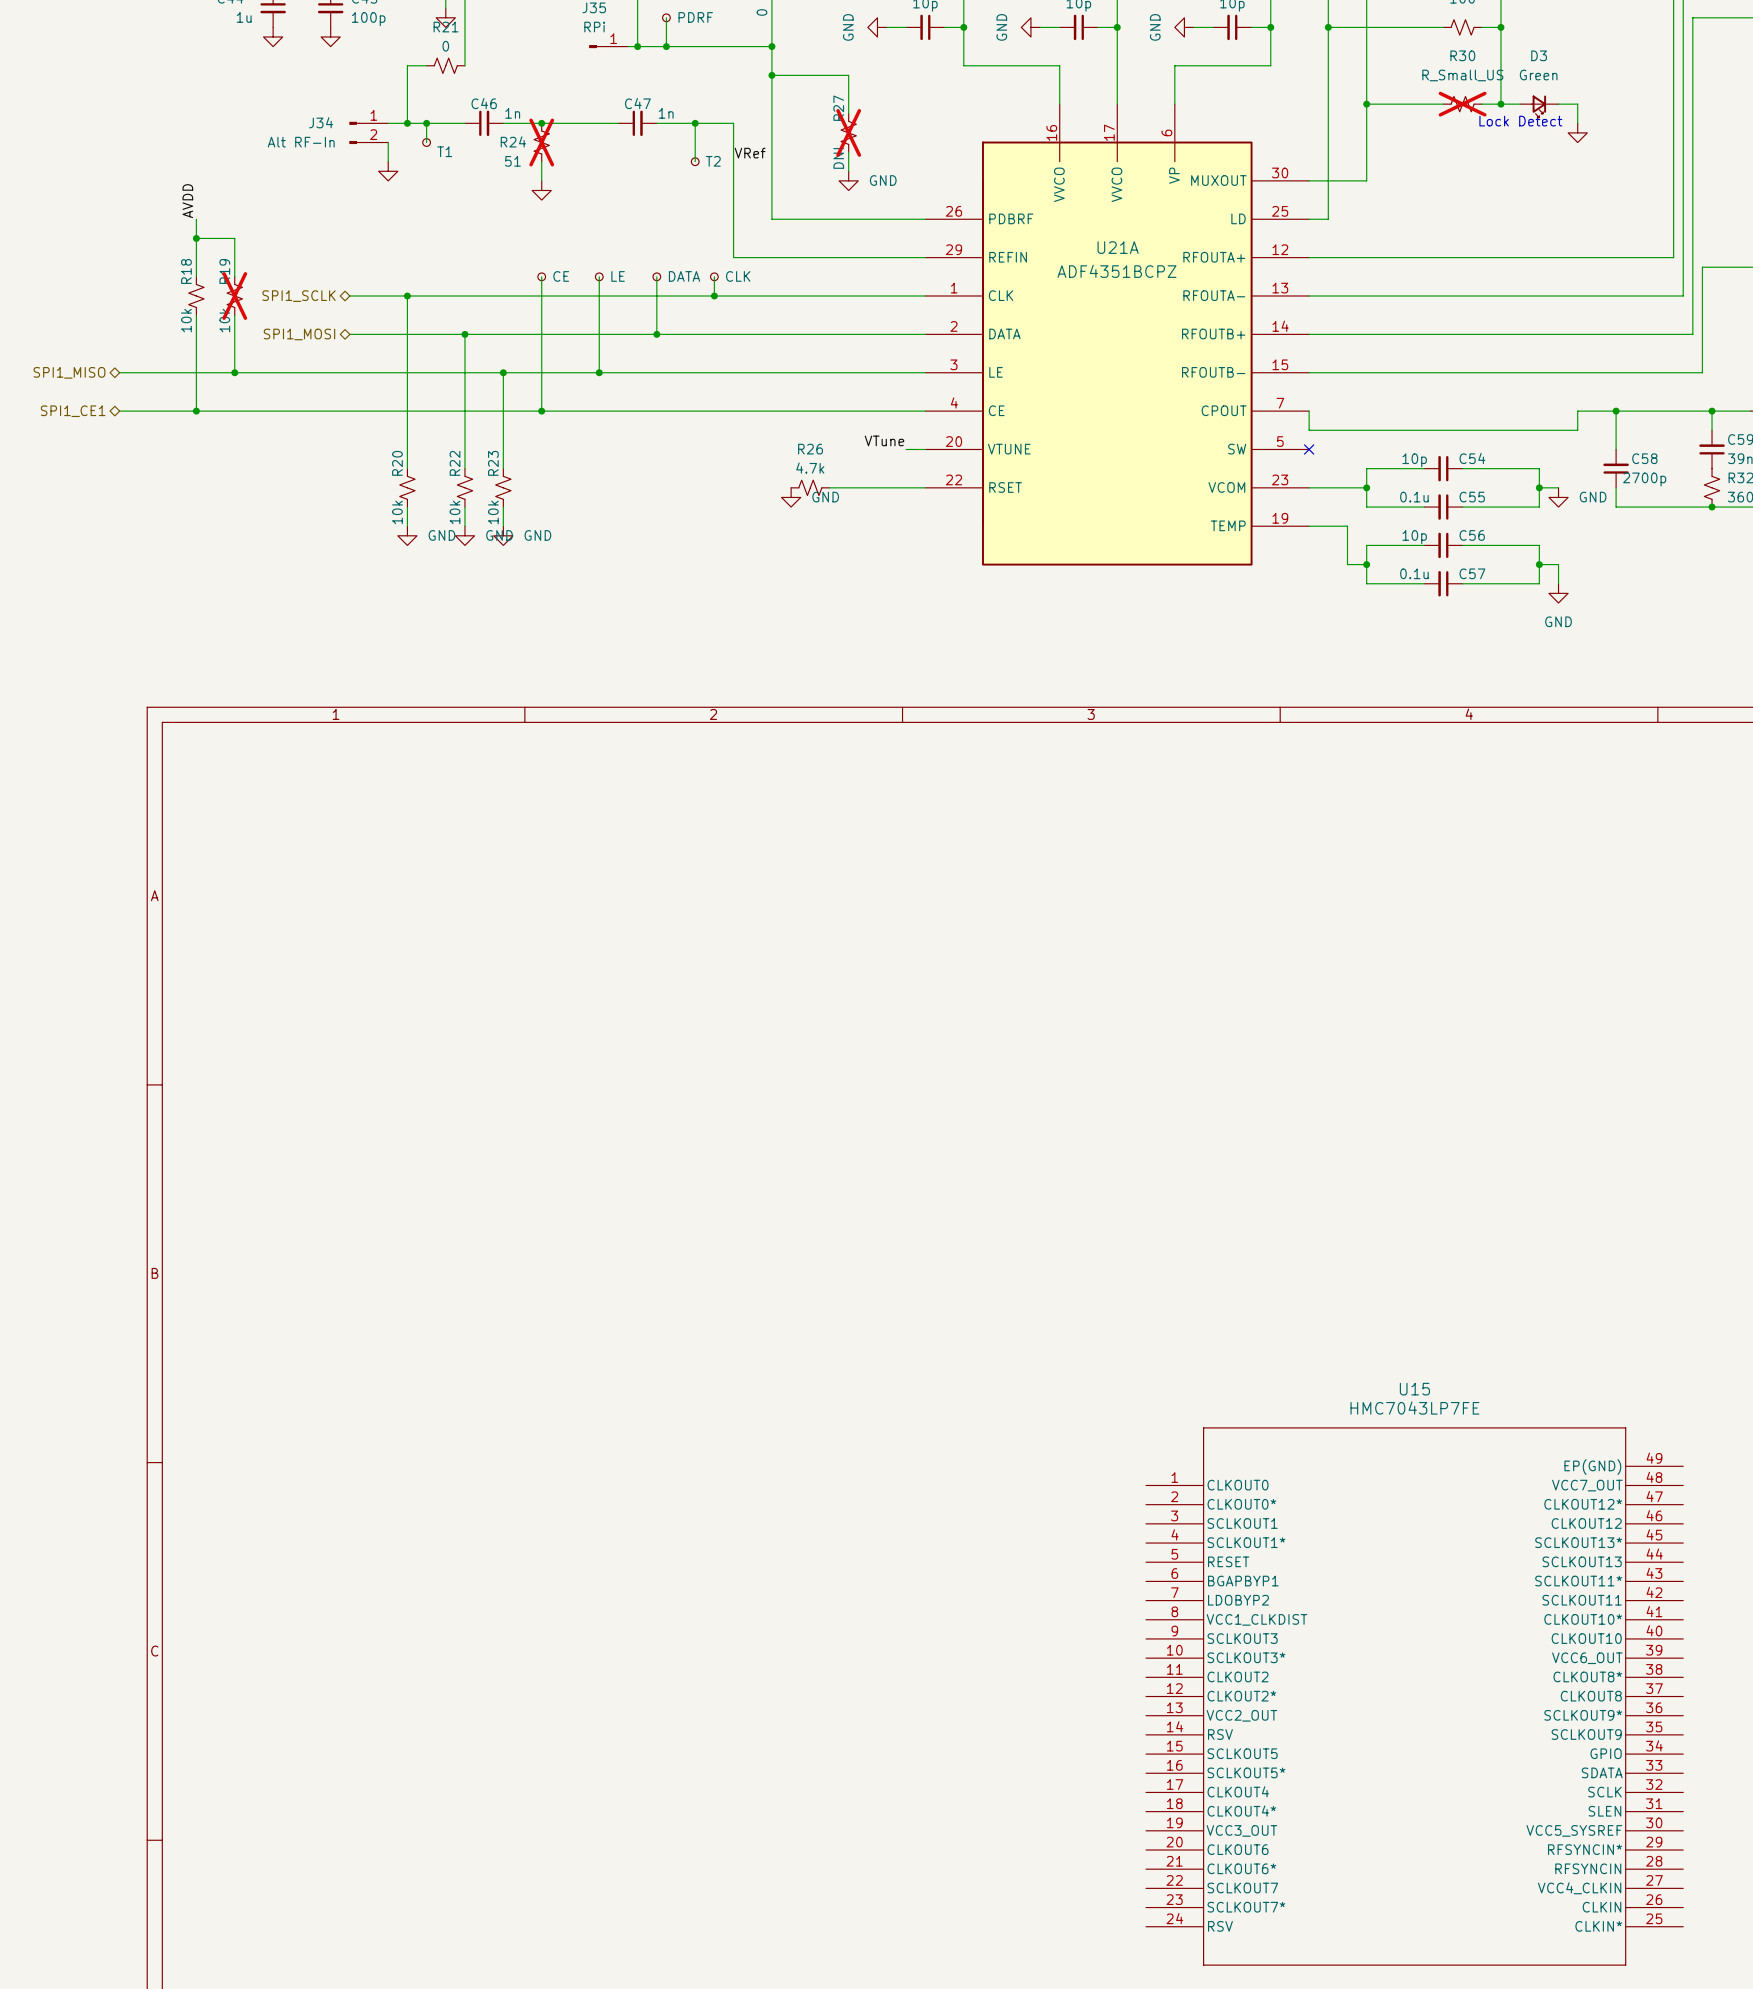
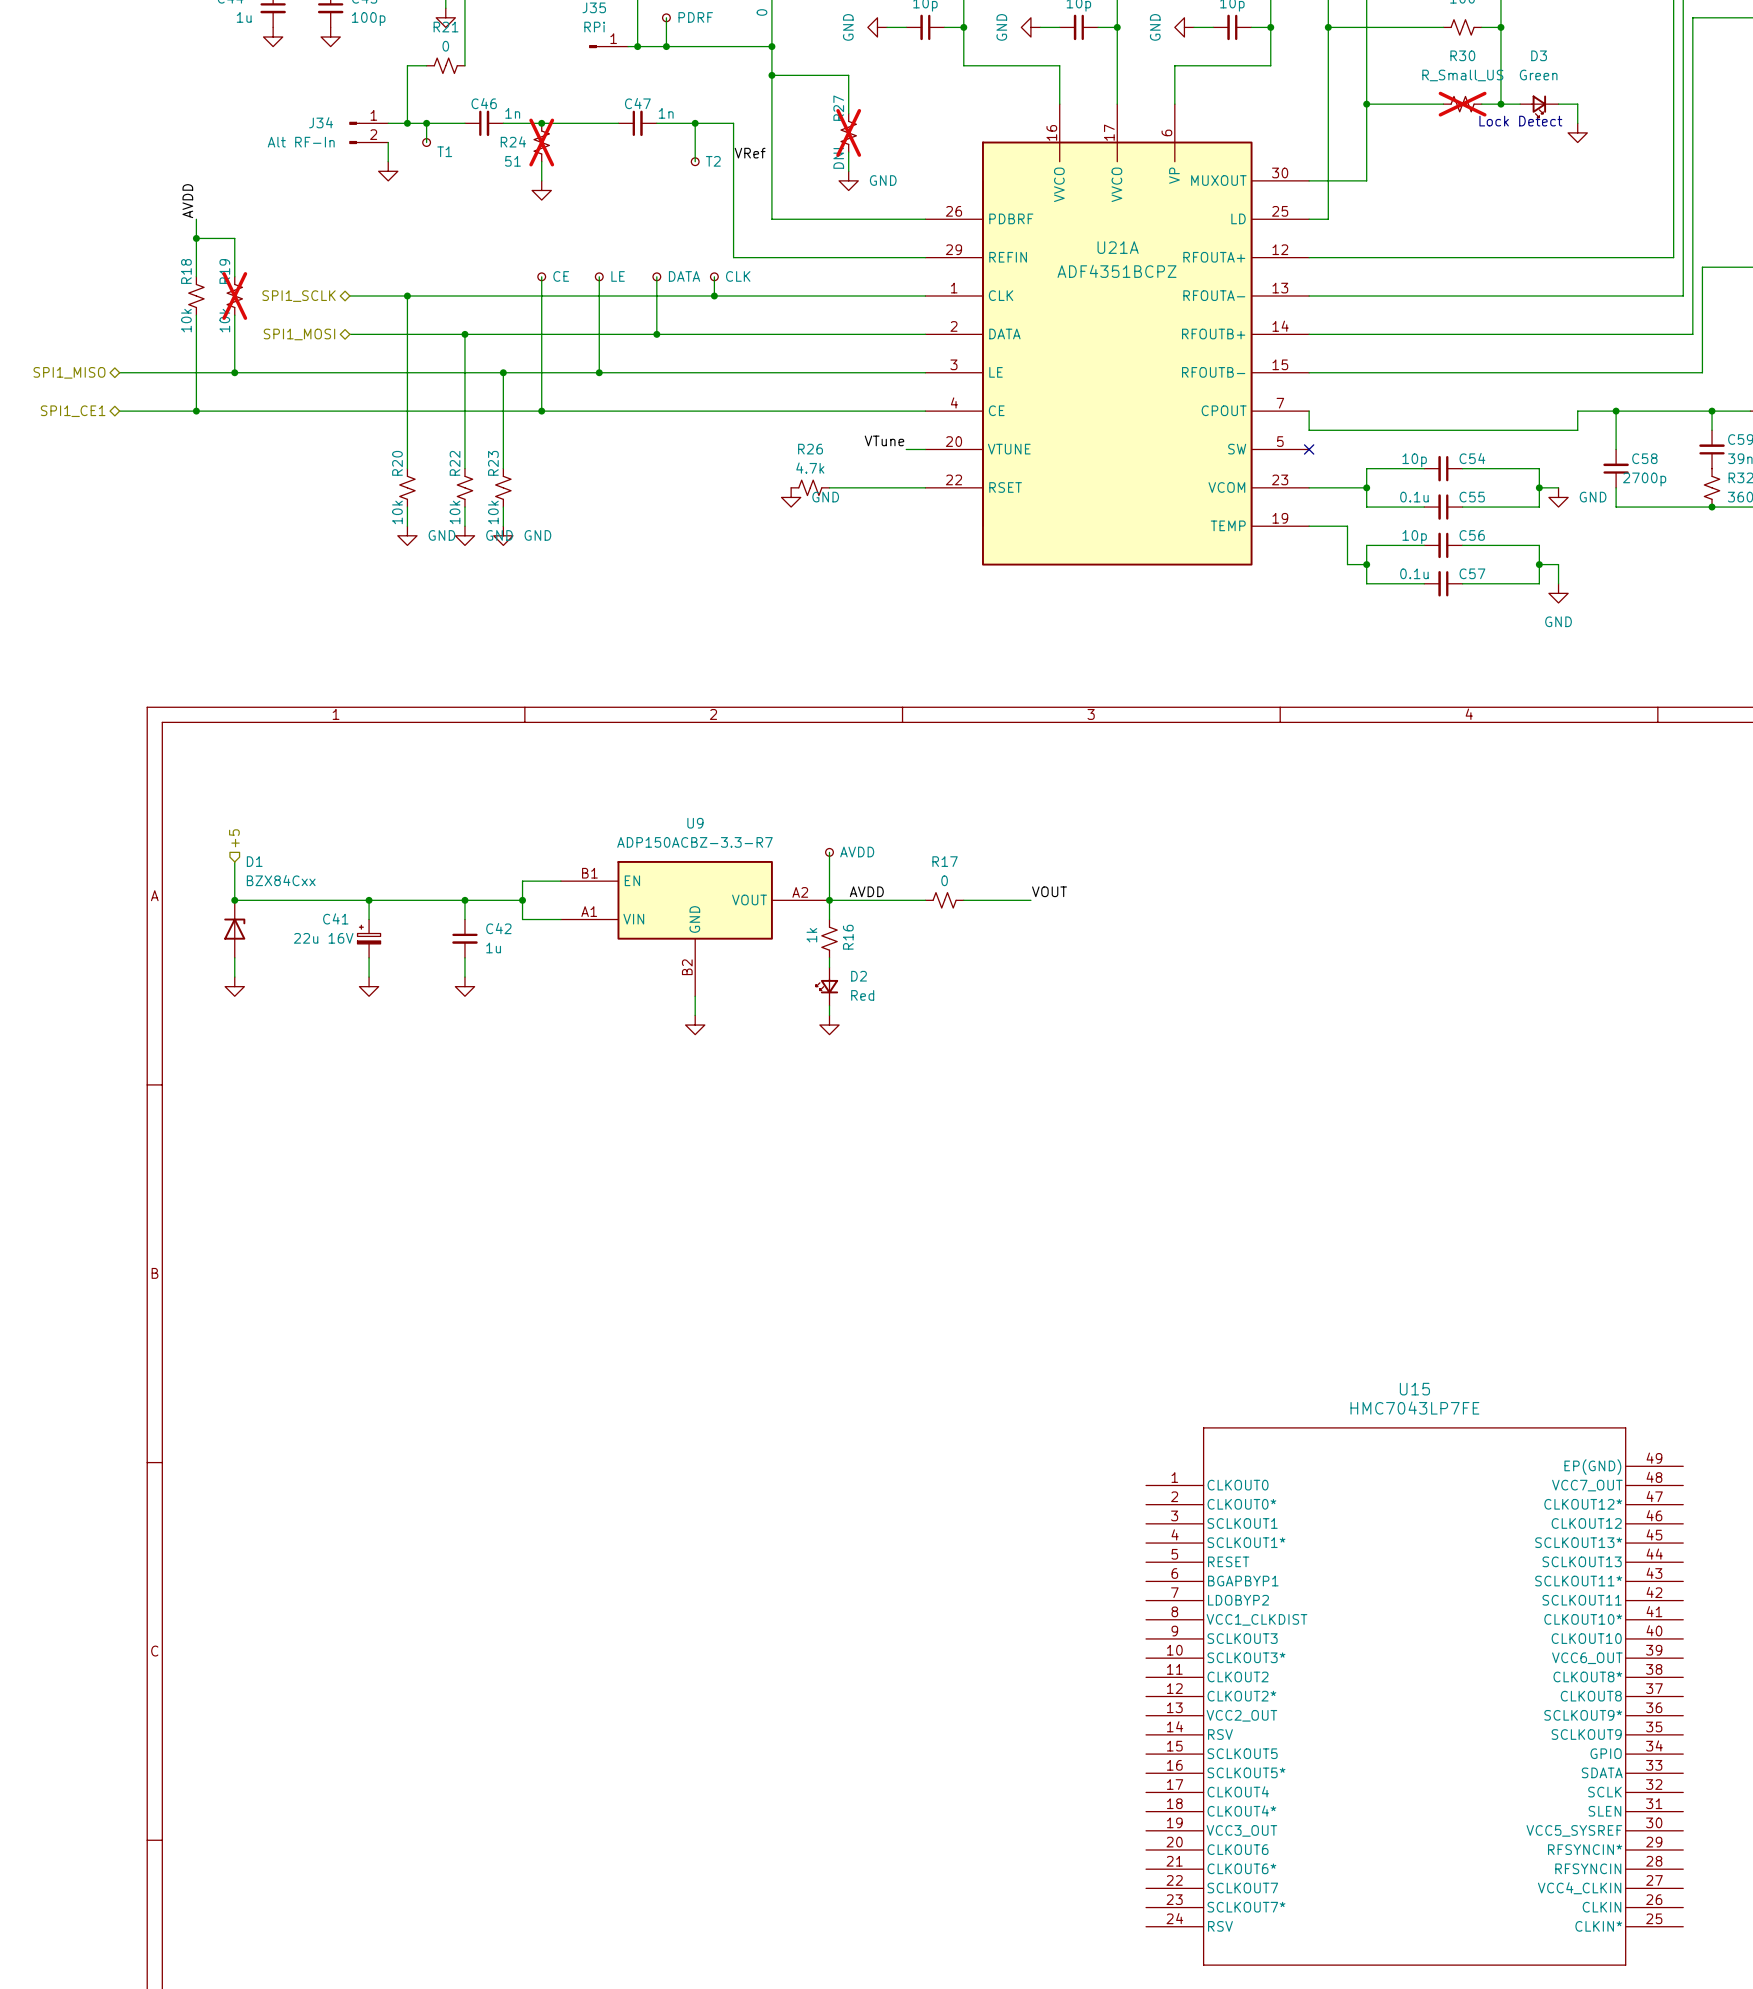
hierarchical label: none -> +5 (234, 838)
wire: none -> (829, 852) (829, 919)
part: none -> AVDD (829, 852)
wire: none -> (234, 861) (234, 900) (522, 900)
wire: none -> (560, 881) (522, 881) (522, 919) (560, 919)
label: none -> AVDD (866, 891)
label: none -> VOUT (1049, 891)
junction: none -> (234, 900)
wire: none -> (369, 900) (369, 919)
junction: none -> (369, 900)
wire: none -> (464, 900) (464, 919)
junction: none -> (464, 900)
junction: none -> (522, 900)
wire: none -> (829, 900) (925, 900)
junction: none -> (829, 900)
R17: none -> 0 (944, 900)
wire: none -> (963, 900) (1030, 900)
U9: none -> ADP150ACBZ-3.3-R7 (695, 928)
D1: none -> BZX84Cxx (234, 929)
C41: none -> 22u 16V (369, 938)
C42: none -> 1u (464, 938)
R16: none -> 1k (829, 938)
wire: none -> (234, 957) (234, 977)
wire: none -> (369, 957) (369, 977)
wire: none -> (464, 957) (464, 977)
wire: none -> (829, 957) (829, 967)
power symbol: none -> (234, 986)
power symbol: none -> (369, 986)
power symbol: none -> (464, 986)
D2: none -> Red (827, 986)
wire: none -> (695, 996) (695, 1015)
wire: none -> (829, 1005) (829, 1015)
power symbol: none -> (695, 1025)
power symbol: none -> (829, 1025)

